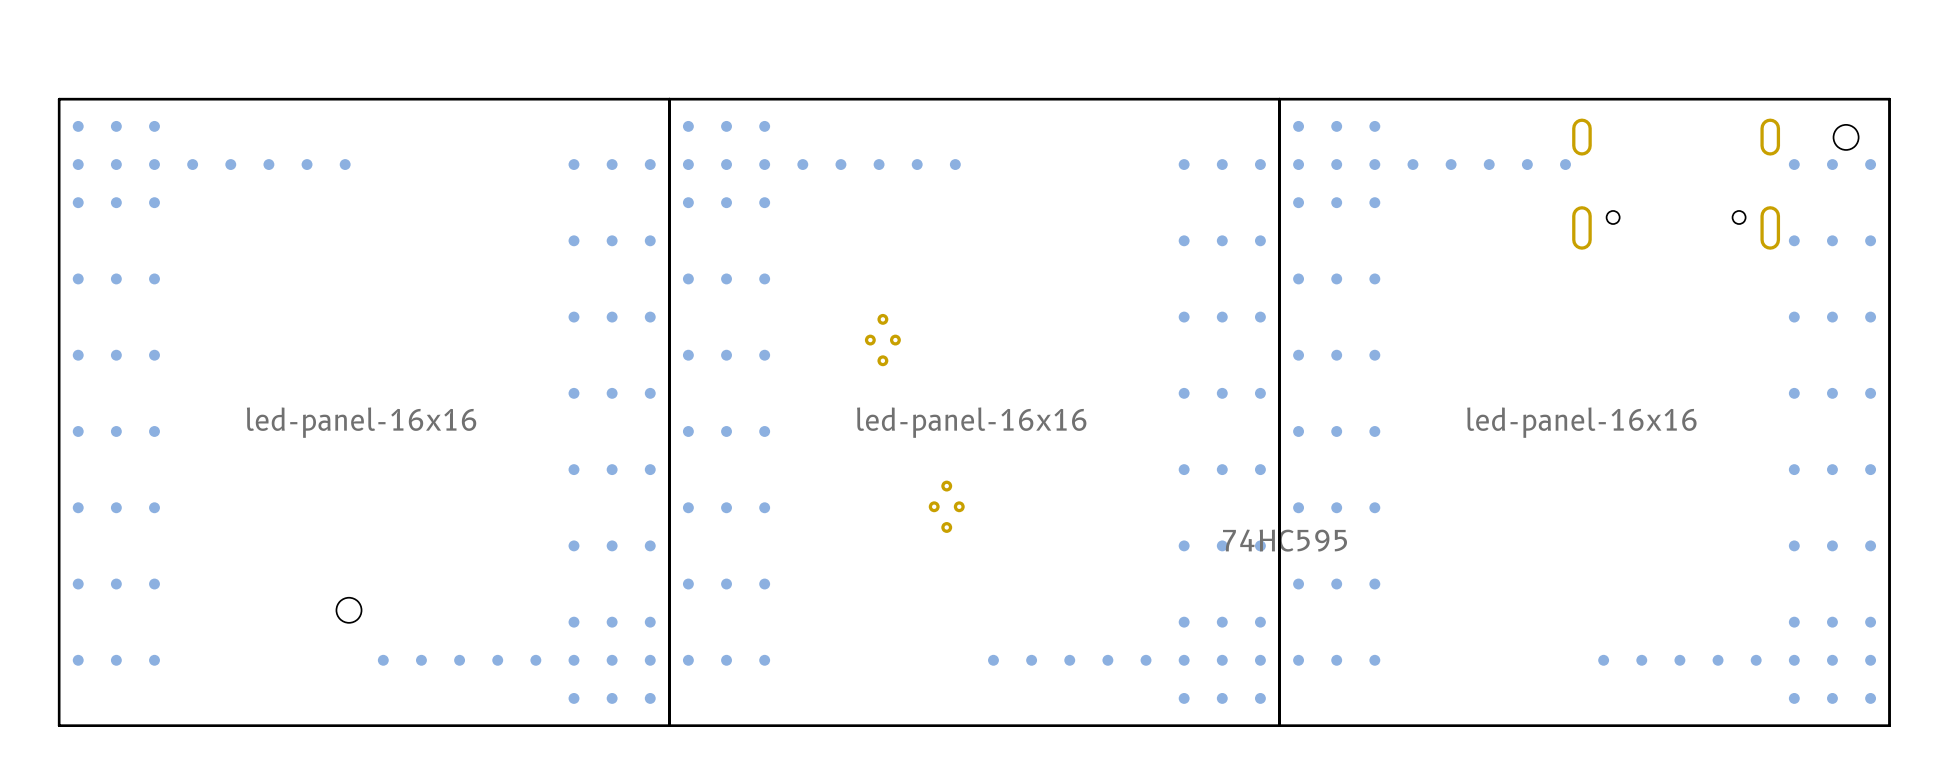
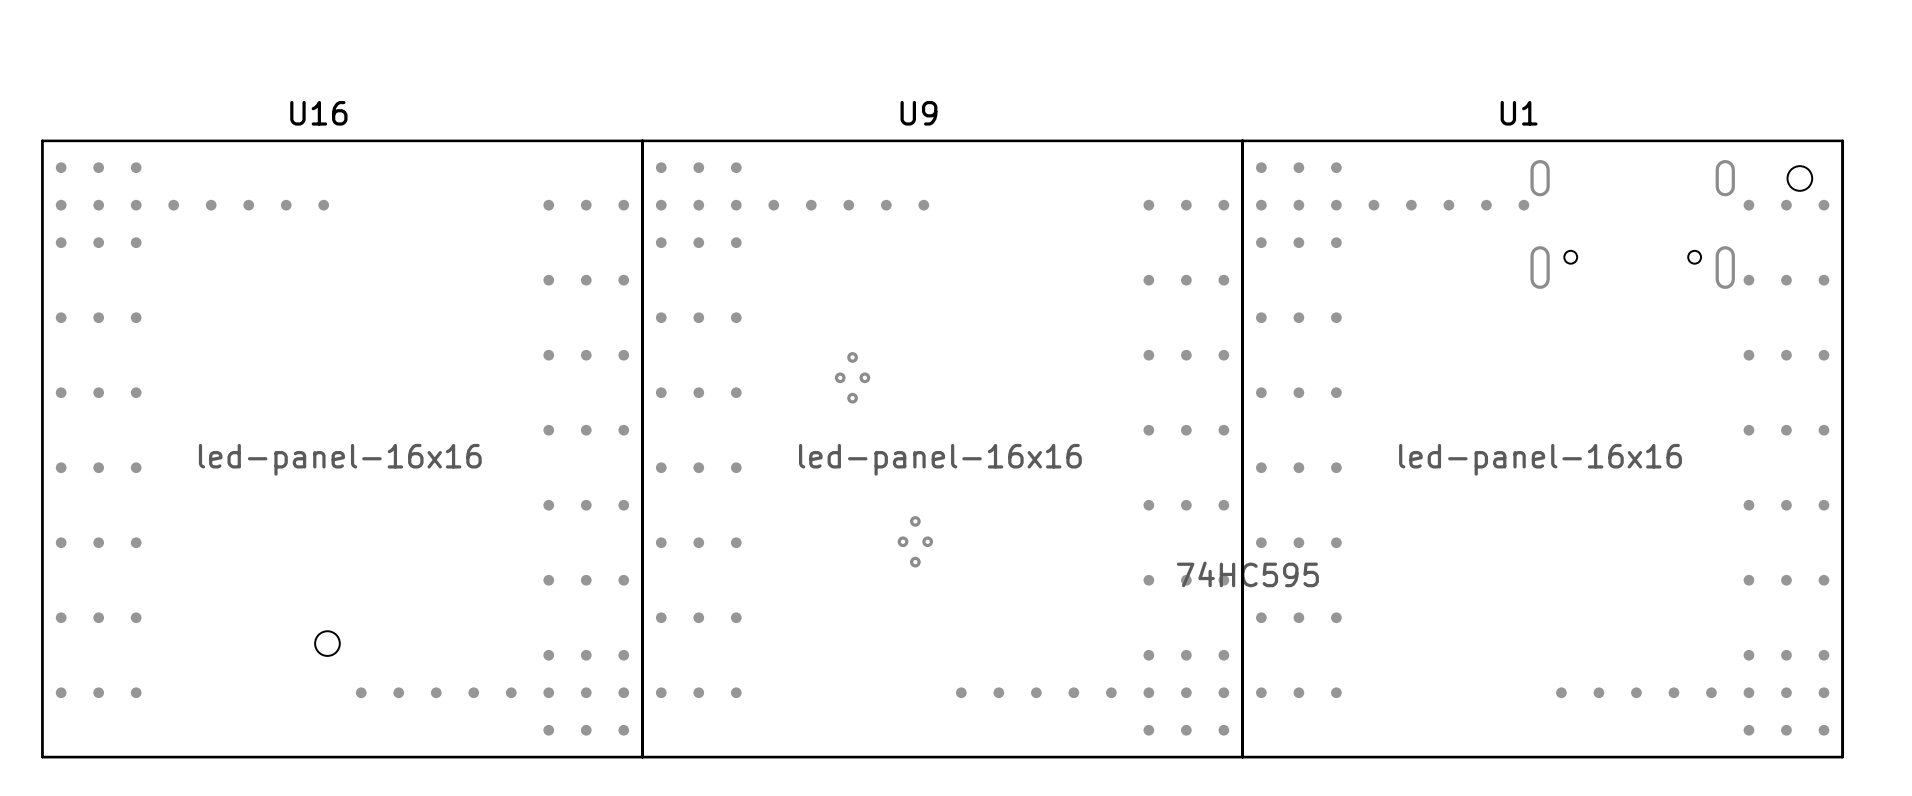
U16 name: none -> U16 (318, 113)
U9 name: none -> U9 (918, 113)
U1 name: none -> U1 (1519, 113)

